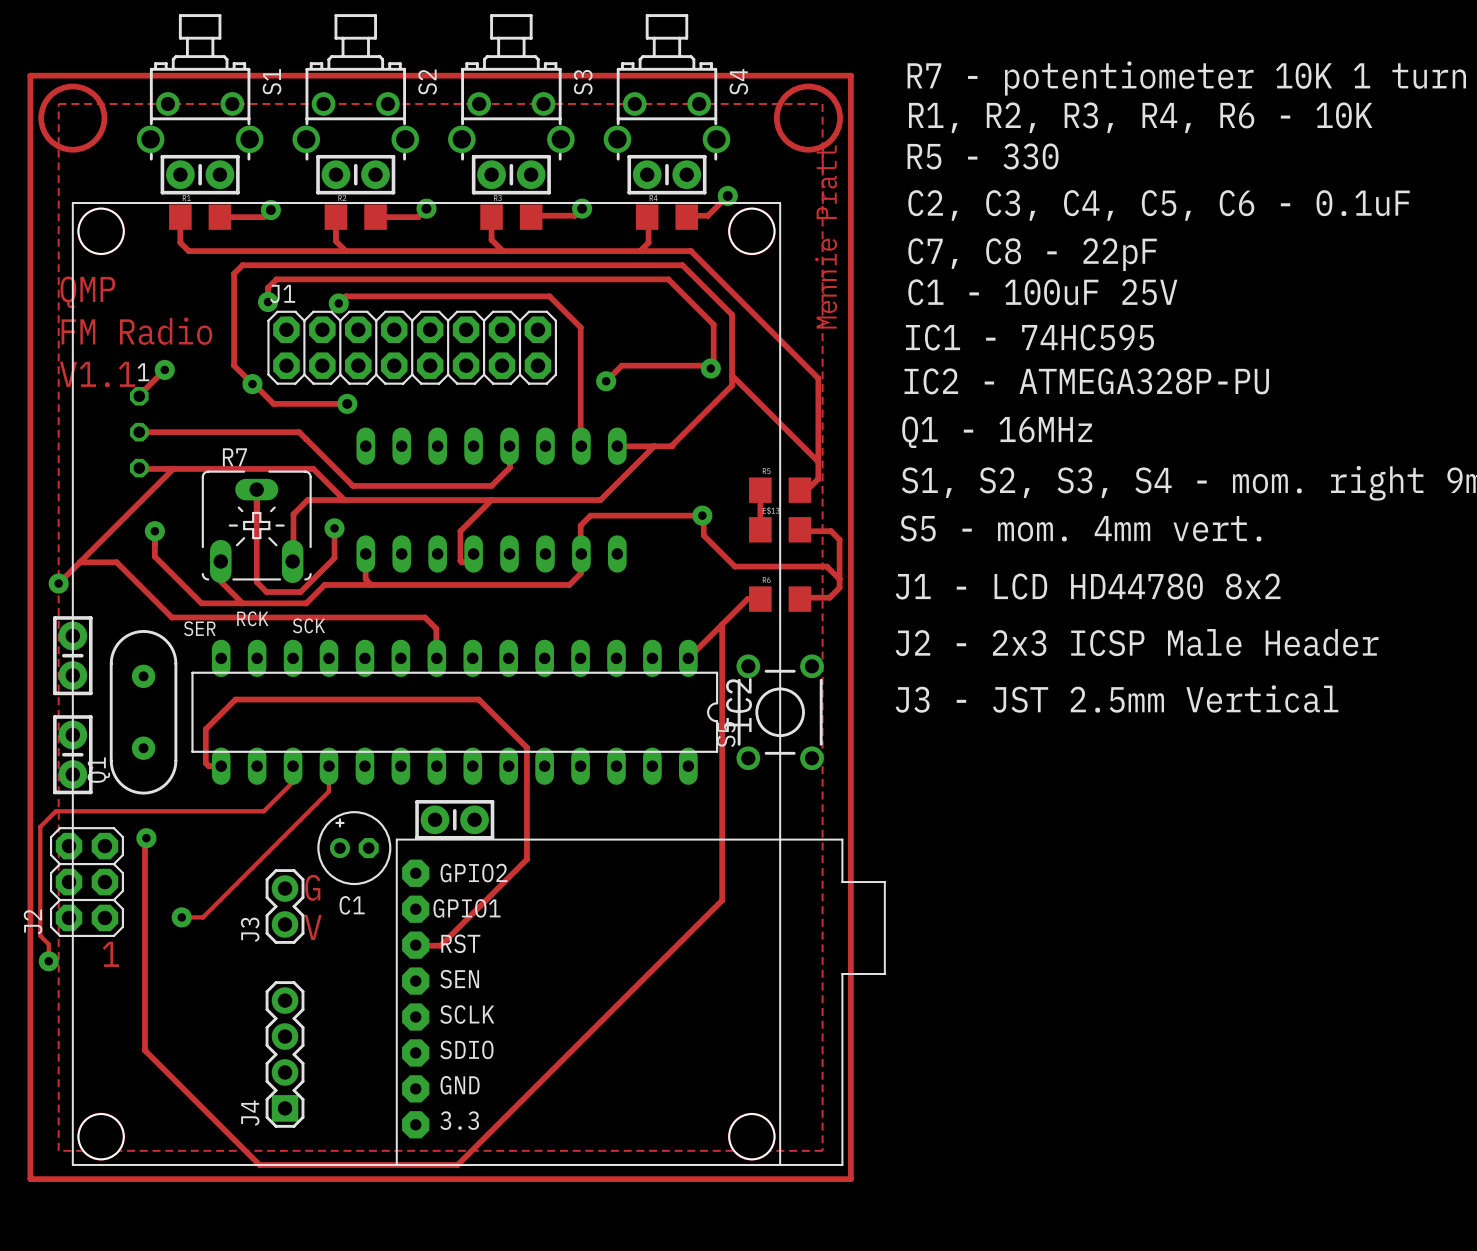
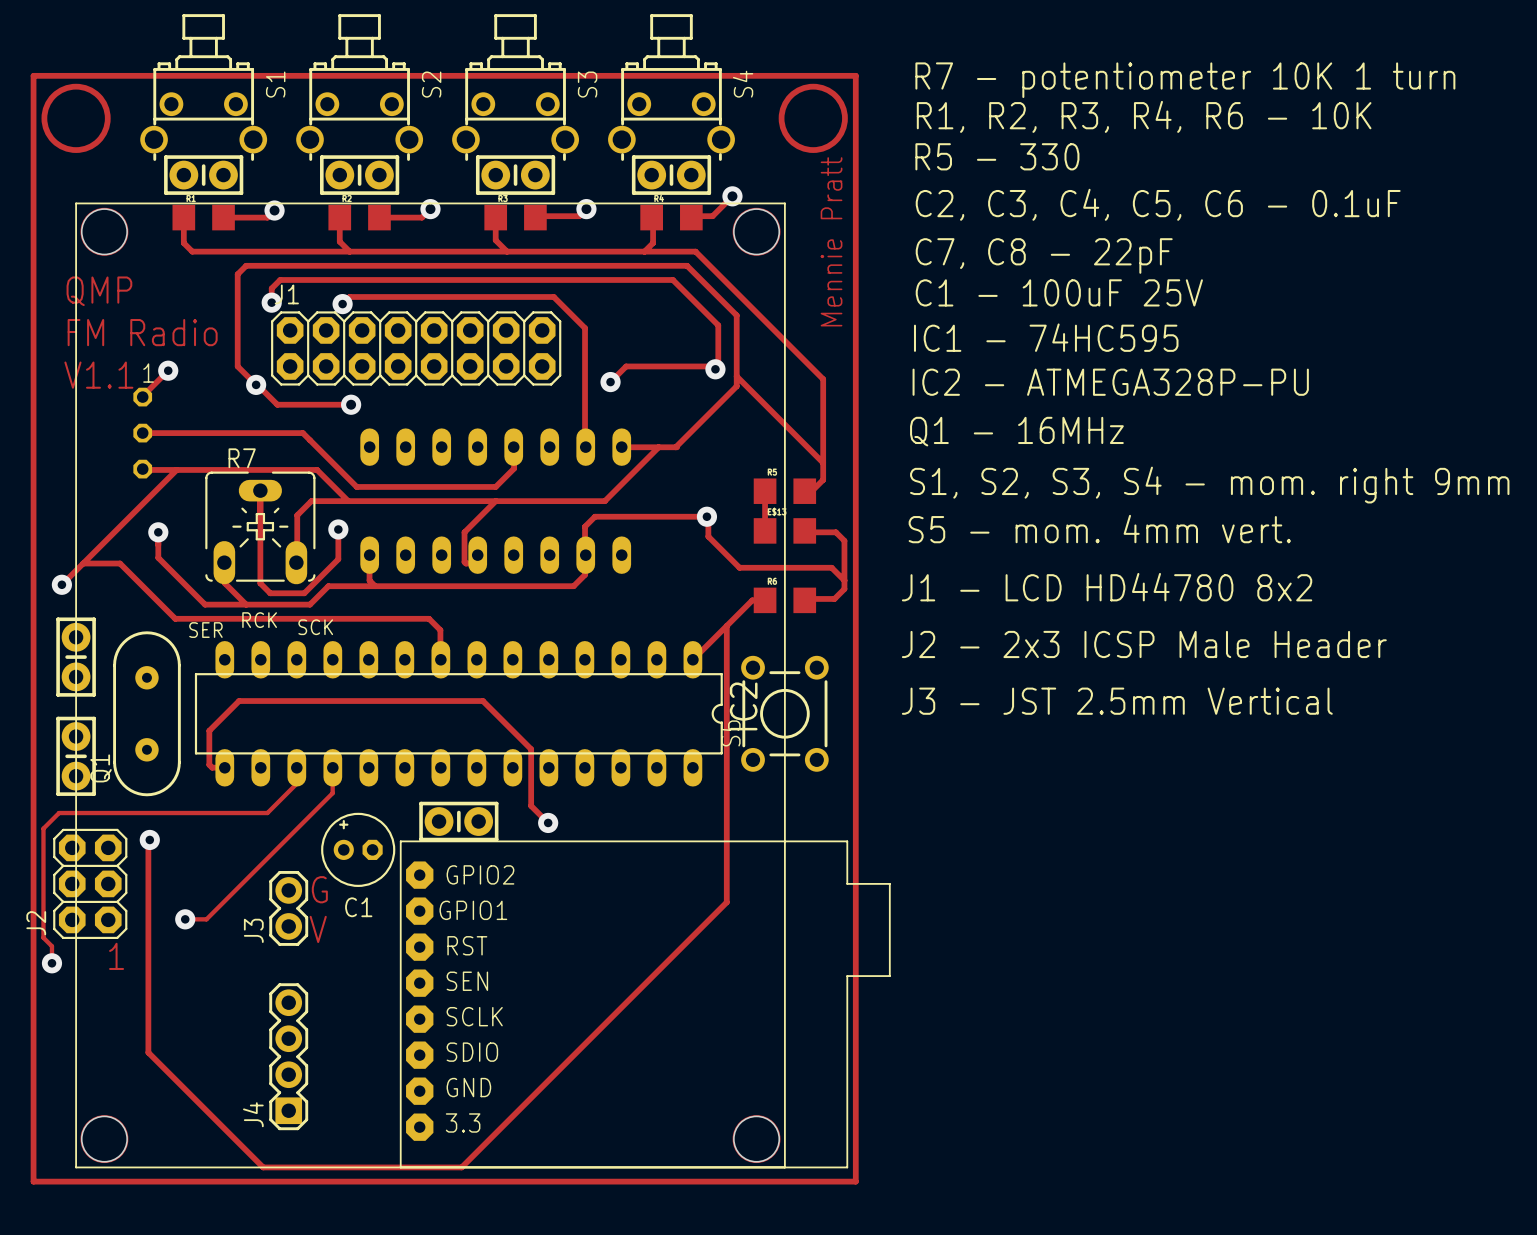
zone outline: (58, 103) (822, 103) (822, 1150) (58, 1150) (58, 103) -> none
track: (526, 804) (526, 859) (440, 945) (415, 945) -> (531, 805) (548, 822)
via: none -> (548, 822)

